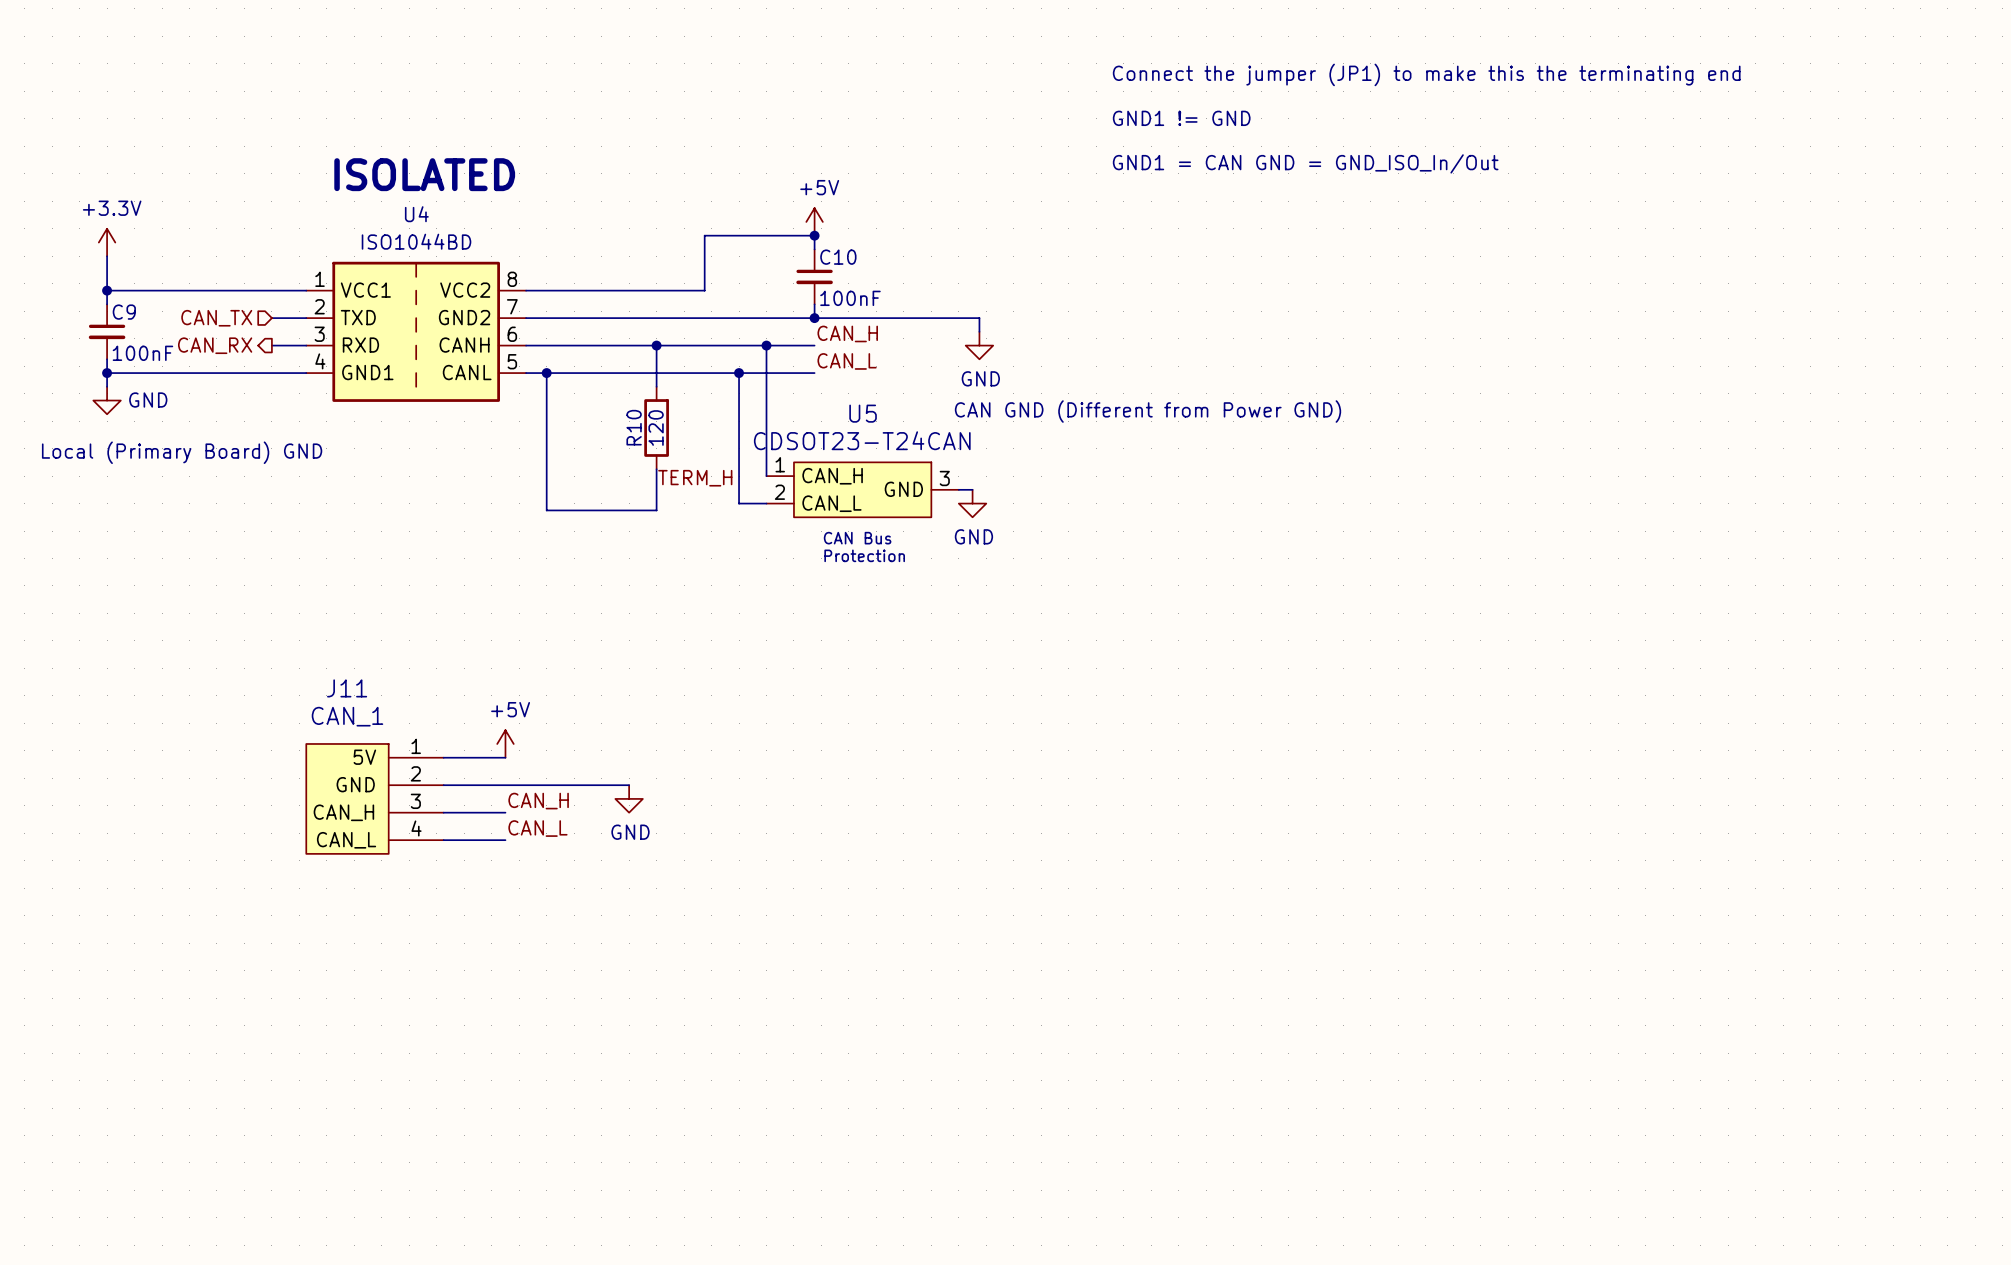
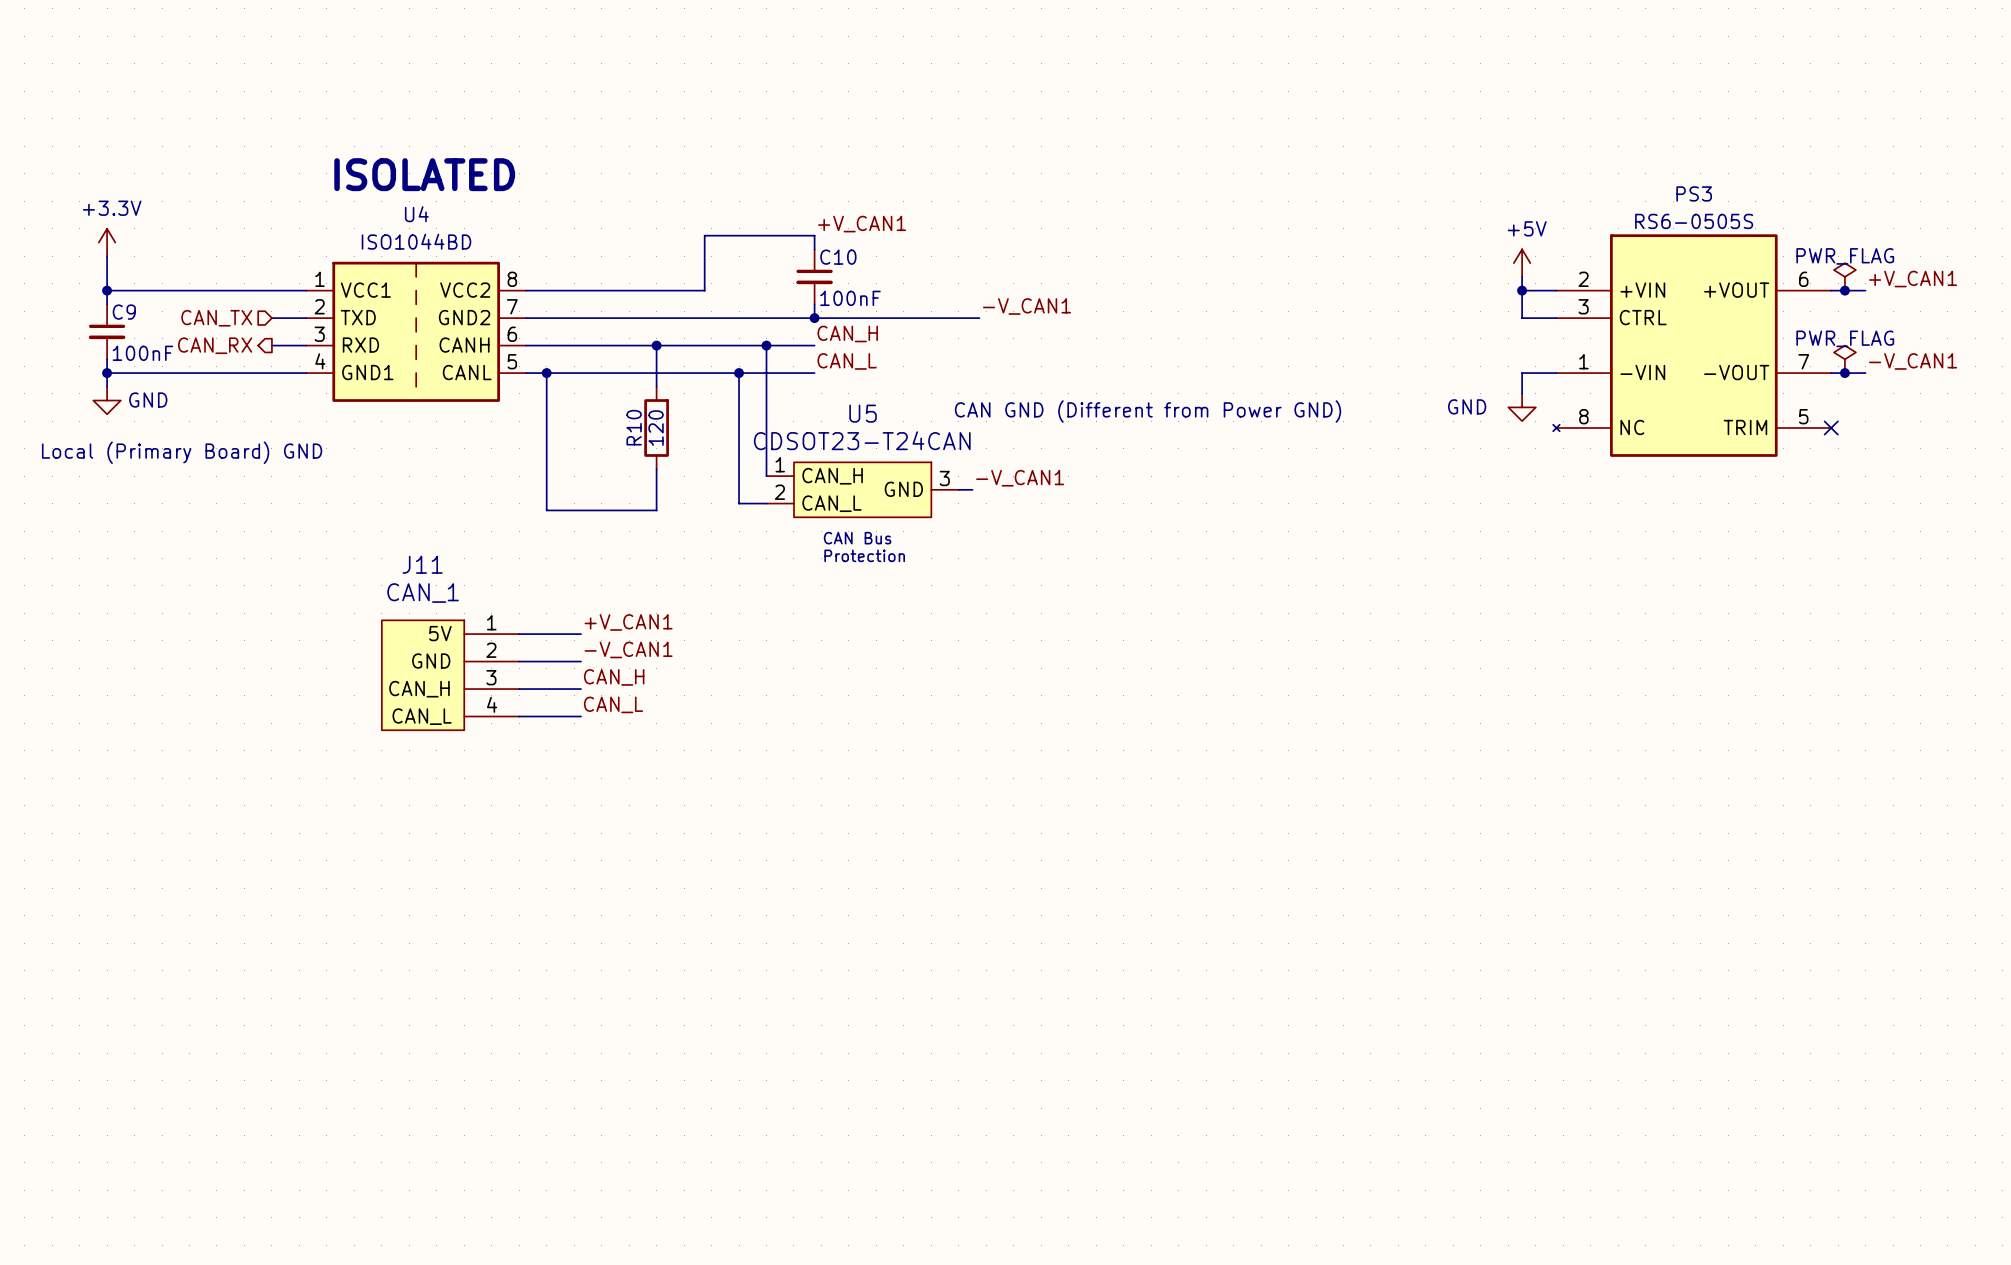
text: Connect the jumper (JP1) to make this the terminating end (1426, 74) -> none
text: GND1 != GND (1181, 118) -> none
text: GND1 = CAN GND = GND_ISO_In/Out (1305, 163) -> none
power symbol: +5V (814, 221) -> none
label: none -> +V_CAN1 (862, 224)
junction: (814, 235) -> none
power symbol: none -> +5V (1522, 263)
wire: none -> (1522, 276) (1522, 318) (1556, 318)
power symbol: none -> PWR_FLAG (1844, 276)
label: none -> +V_CAN1 (1913, 279)
wire: none -> (1522, 290) (1556, 290)
junction: none -> (1522, 290)
wire: none -> (1831, 290) (1865, 290)
junction: none -> (1844, 290)
label: none -> -V_CAN1 (1026, 306)
wire: (979, 318) (979, 331) -> none
power symbol: GND (979, 345) -> none
PS3: none -> RS6-0505S (1692, 345)
power symbol: none -> PWR_FLAG (1844, 359)
label: none -> -V_CAN1 (1913, 361)
wire: none -> (1556, 373) (1522, 373) (1522, 393)
wire: none -> (1831, 373) (1865, 373)
junction: none -> (1844, 373)
power symbol: none -> GND (1522, 407)
no-connect mark: none -> (1831, 428)
label: TERM_H (695, 478) -> none
label: none -> -V_CAN1 (1020, 478)
power symbol: GND (972, 503) -> none
label: none -> +V_CAN1 (628, 622)
label: none -> -V_CAN1 (628, 649)
wire: none -> (519, 661) (581, 661)
power symbol: +5V (505, 743) -> none
wire: (443, 757) (505, 757) -> (519, 634) (581, 634)
wire: (443, 785) (629, 785) -> none
J11 position: (374, 798) -> (450, 675)
power symbol: GND (629, 798) -> none
label position: CAN_H (538, 801) -> CAN_H (614, 677)
wire: (443, 812) (505, 812) -> (519, 689) (581, 689)
label position: CAN_L (537, 828) -> CAN_L (613, 704)
wire: (443, 840) (505, 840) -> (519, 716) (581, 716)

